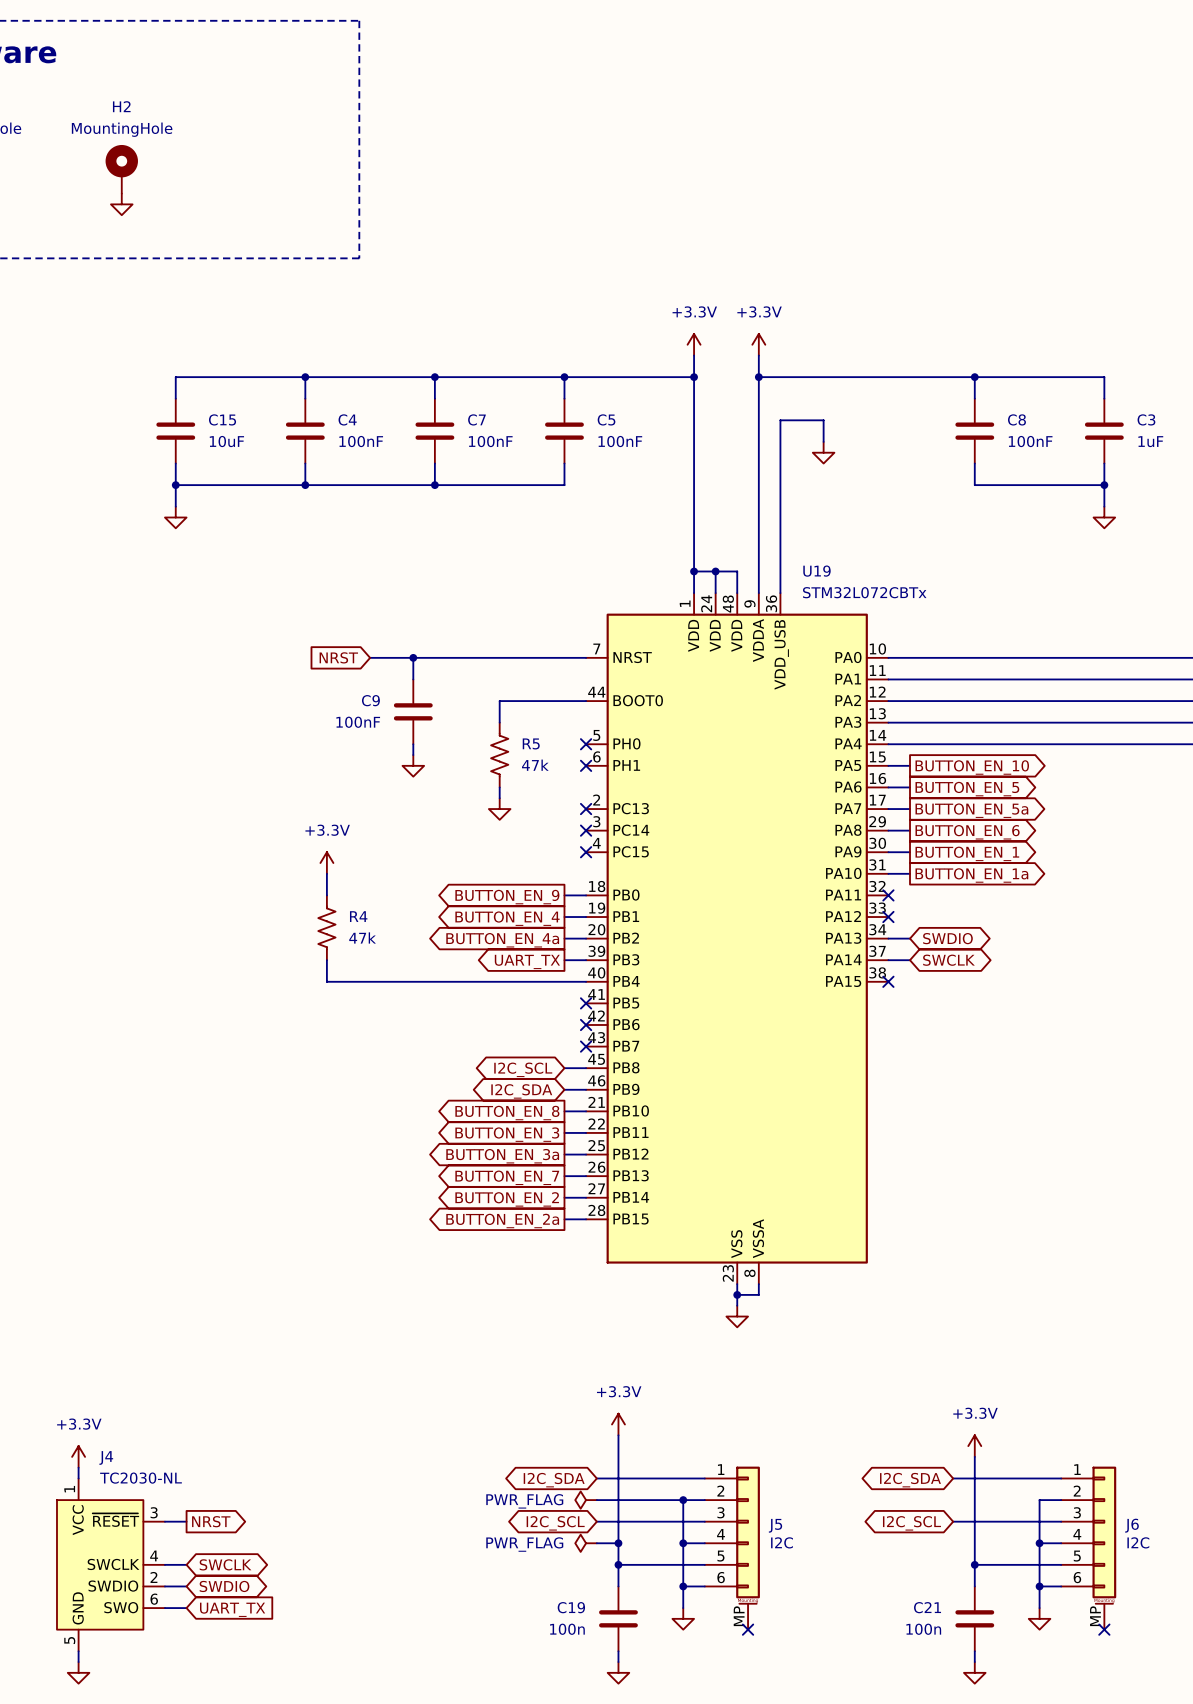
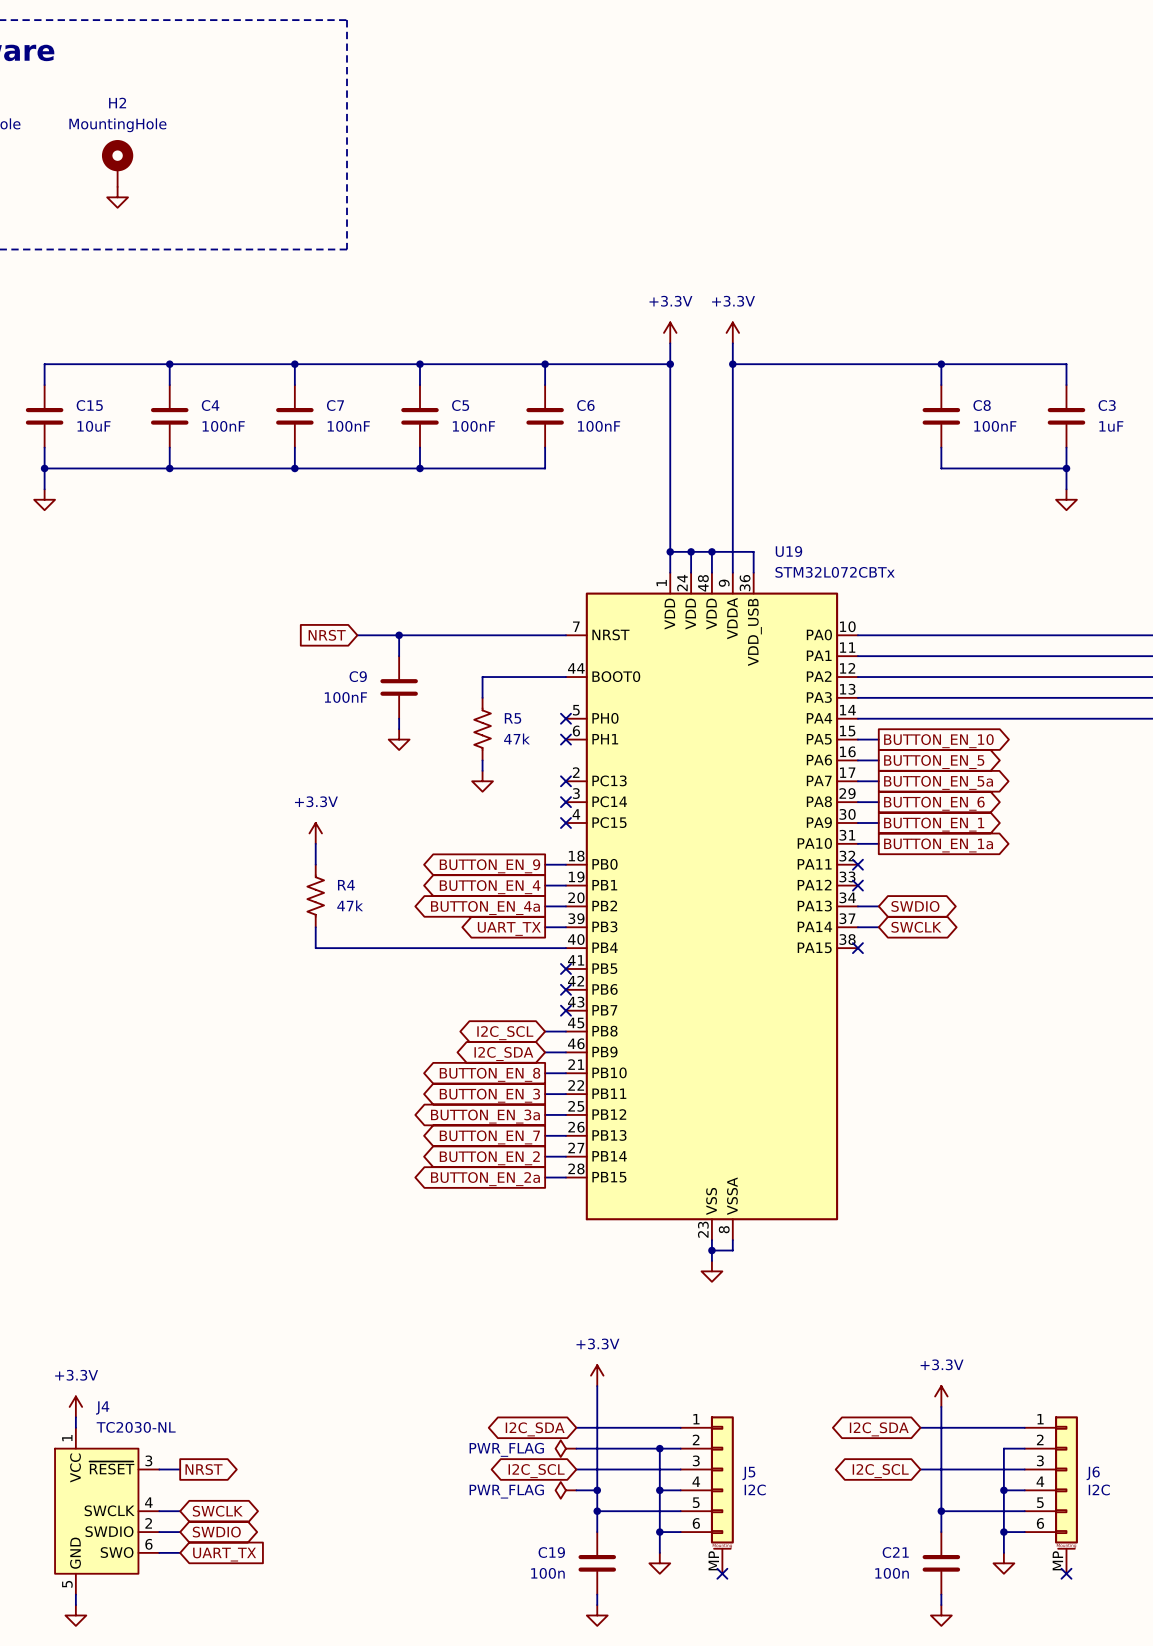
wire: none -> (169, 364) (44, 364) (44, 385)
junction: none -> (169, 364)
C15 name: C15 (222, 419) -> C4 (210, 405)
C4 name: C4 (347, 419) -> C7 (335, 405)
C7 name: C7 (476, 419) -> C5 (460, 405)
C5 name: C5 (606, 419) -> C6 (585, 405)
C15: none -> 10uF (44, 416)
C15 value: 10uF (226, 441) -> 100nF (223, 426)
wire: (823, 441) (823, 420) (780, 420) (780, 571) -> (711, 551) (753, 551)
power symbol: (823, 452) -> none
wire: none -> (44, 447) (44, 489)
junction: none -> (44, 468)
wire: (175, 485) (175, 506) -> (169, 468) (44, 468)
power symbol position: (175, 517) -> (44, 499)
junction: none -> (711, 551)

